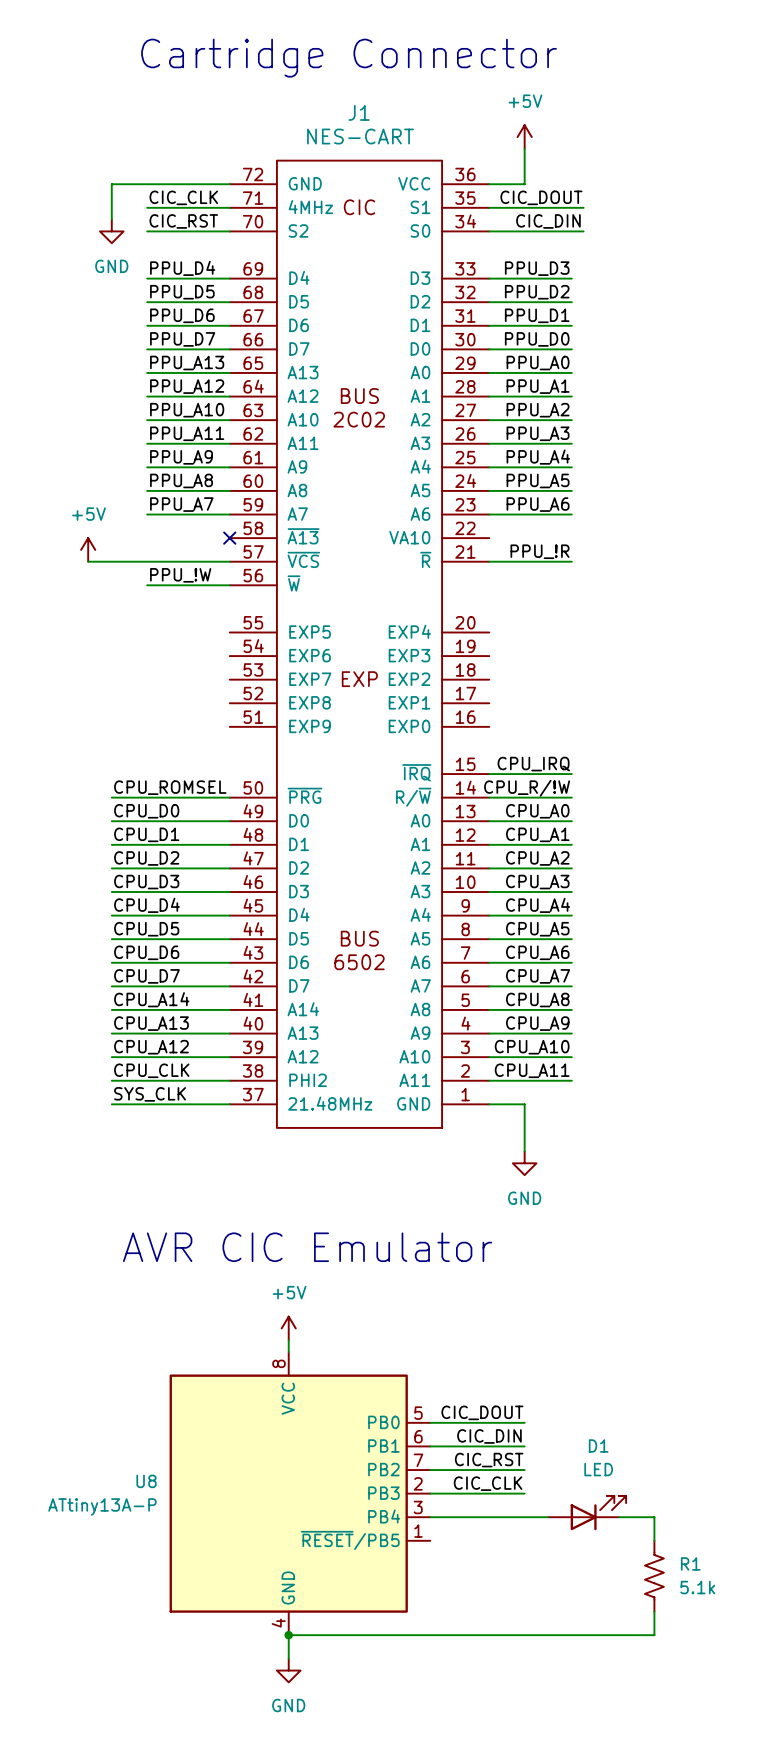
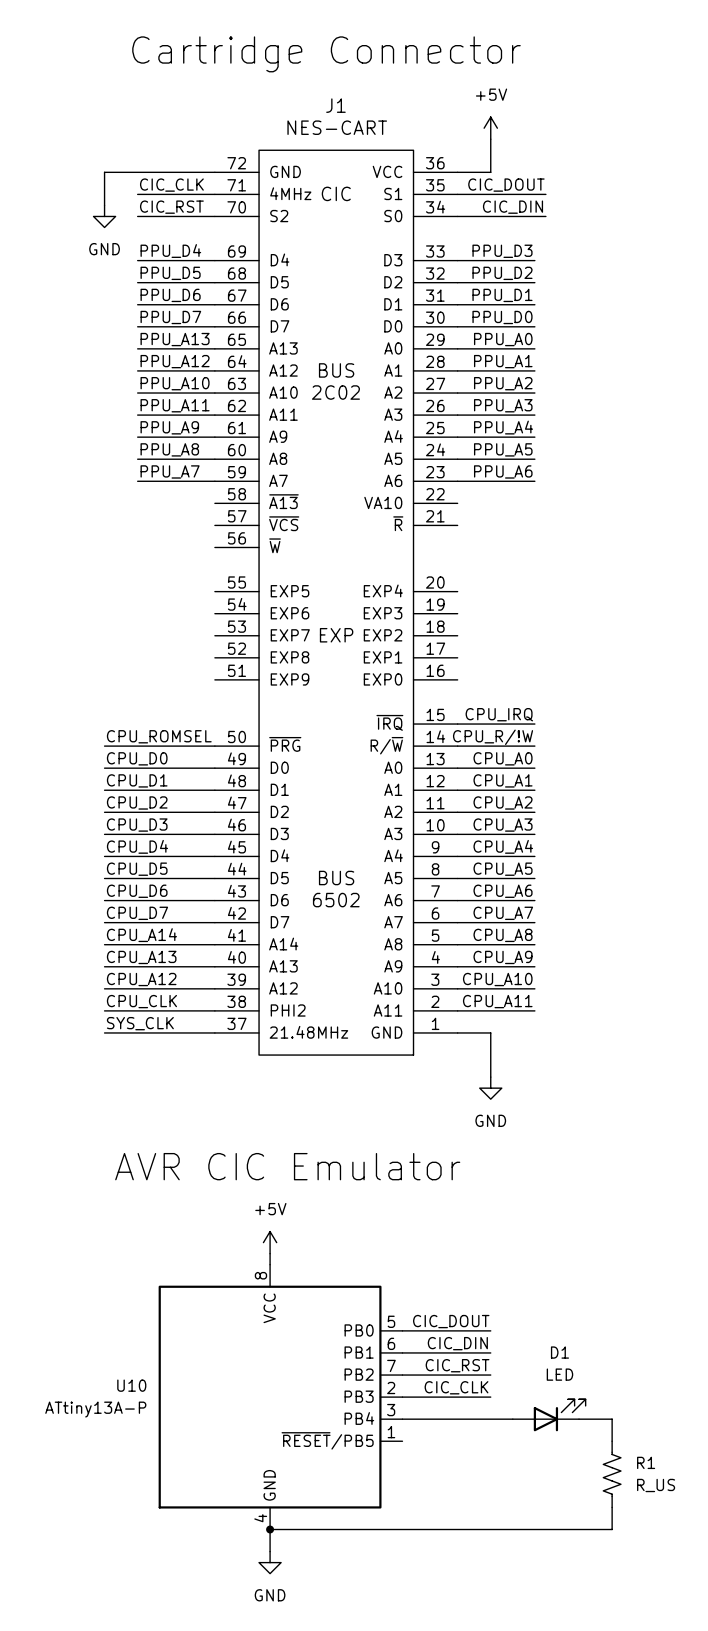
no-connect mark: (229, 538) -> none
power symbol: +5V (88, 549) -> none
label: PPU_!R (540, 551) -> none
wire: (88, 561) (229, 561) -> none
wire: (489, 561) (571, 561) -> none
label: PPU_!W (180, 575) -> none
wire: (147, 585) (229, 585) -> none
U8 name: U8 (146, 1481) -> U10 (131, 1385)
R1 value: 5.1k (697, 1587) -> R_US (656, 1485)

